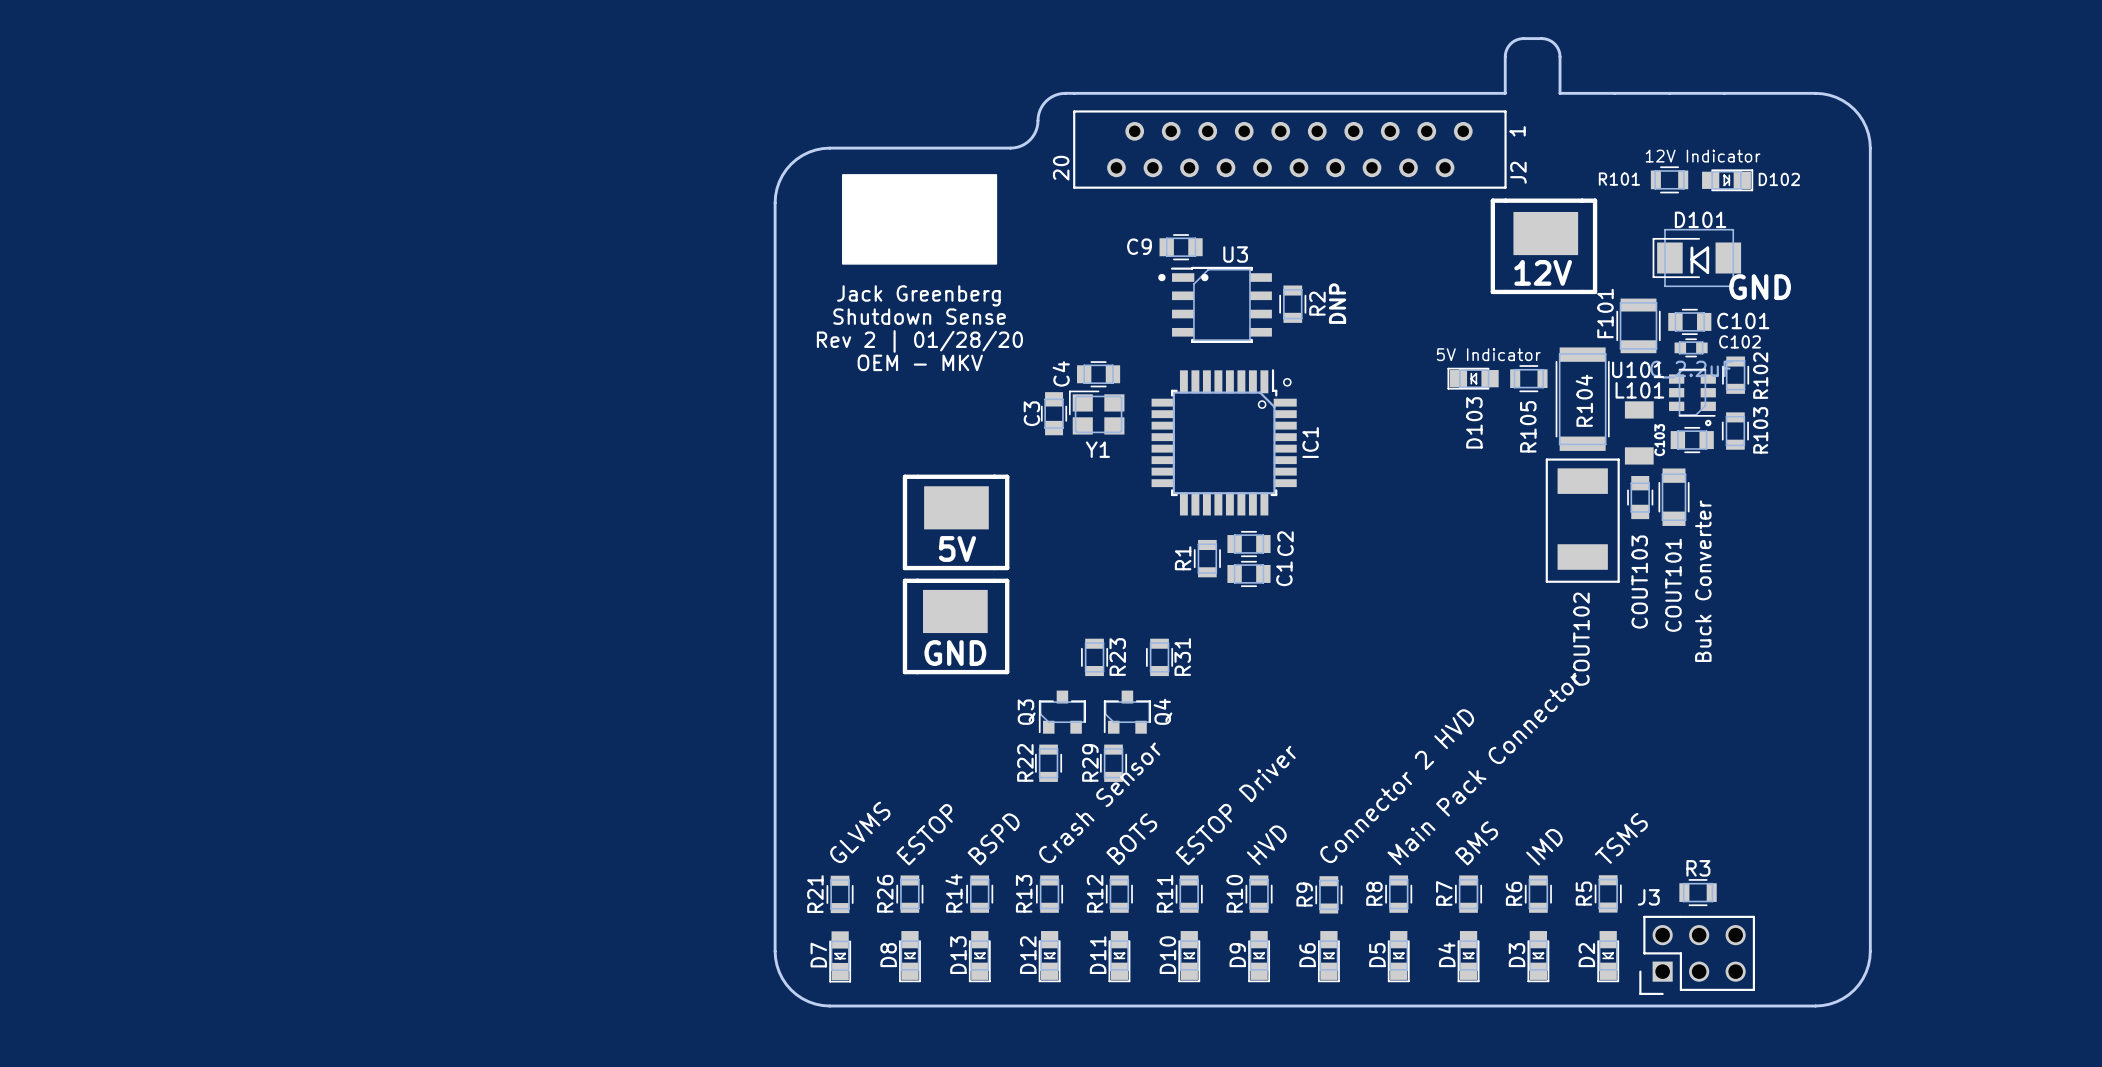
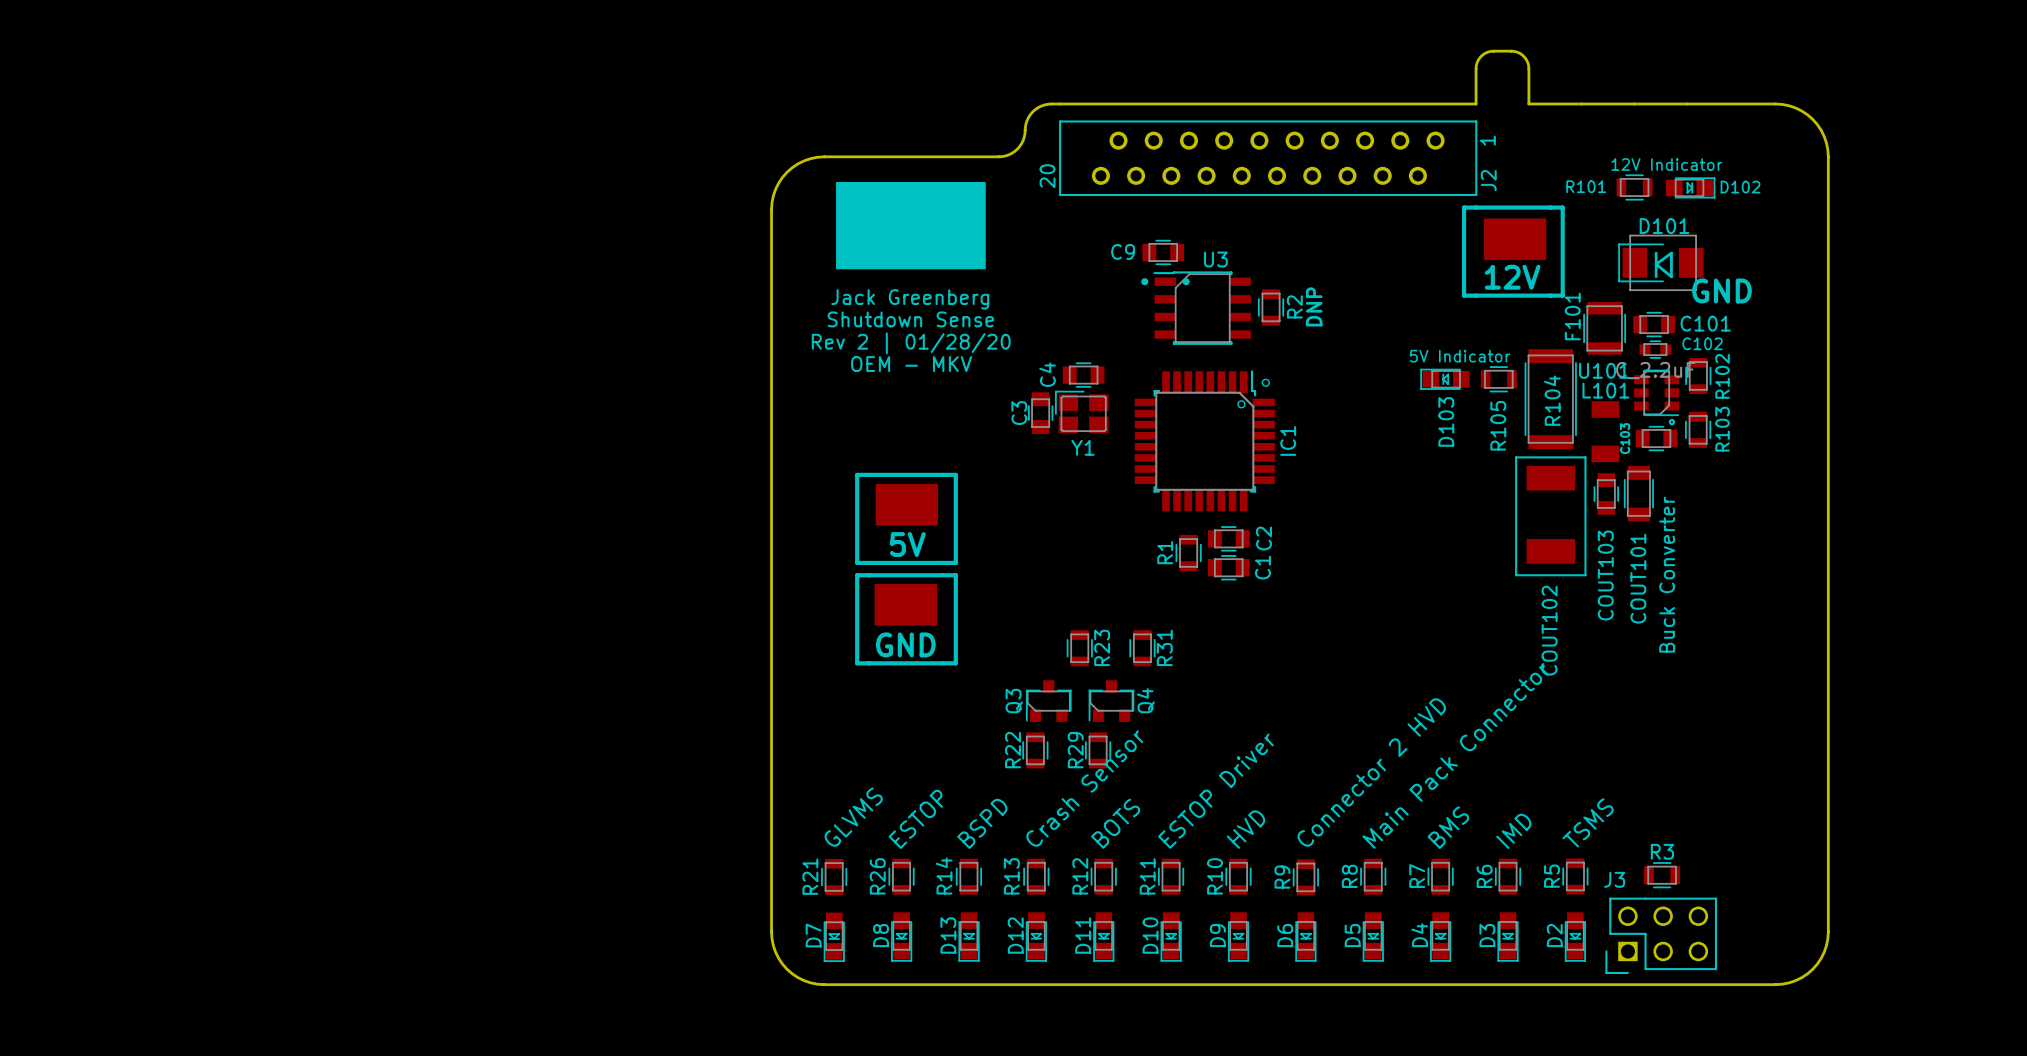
line: (917, 476) (904, 476) (904, 568) (917, 568) -> (869, 474) (857, 474) (857, 562) (869, 562)
line: (918, 476) (1007, 476) (1007, 568) (918, 568) -> (869, 474) (955, 474) (955, 562) (869, 562)
part position: (956, 507) -> (906, 504)
text position: 5V (957, 548) -> 5V (907, 544)
line: (993, 580) (904, 580) (904, 672) (993, 672) -> (942, 575) (857, 575) (857, 663) (942, 663)
line: (994, 580) (1007, 580) (1007, 672) (994, 672) -> (943, 575) (955, 575) (955, 663) (943, 663)
part position: (955, 611) -> (905, 604)
text position: GND (955, 653) -> GND (905, 644)

